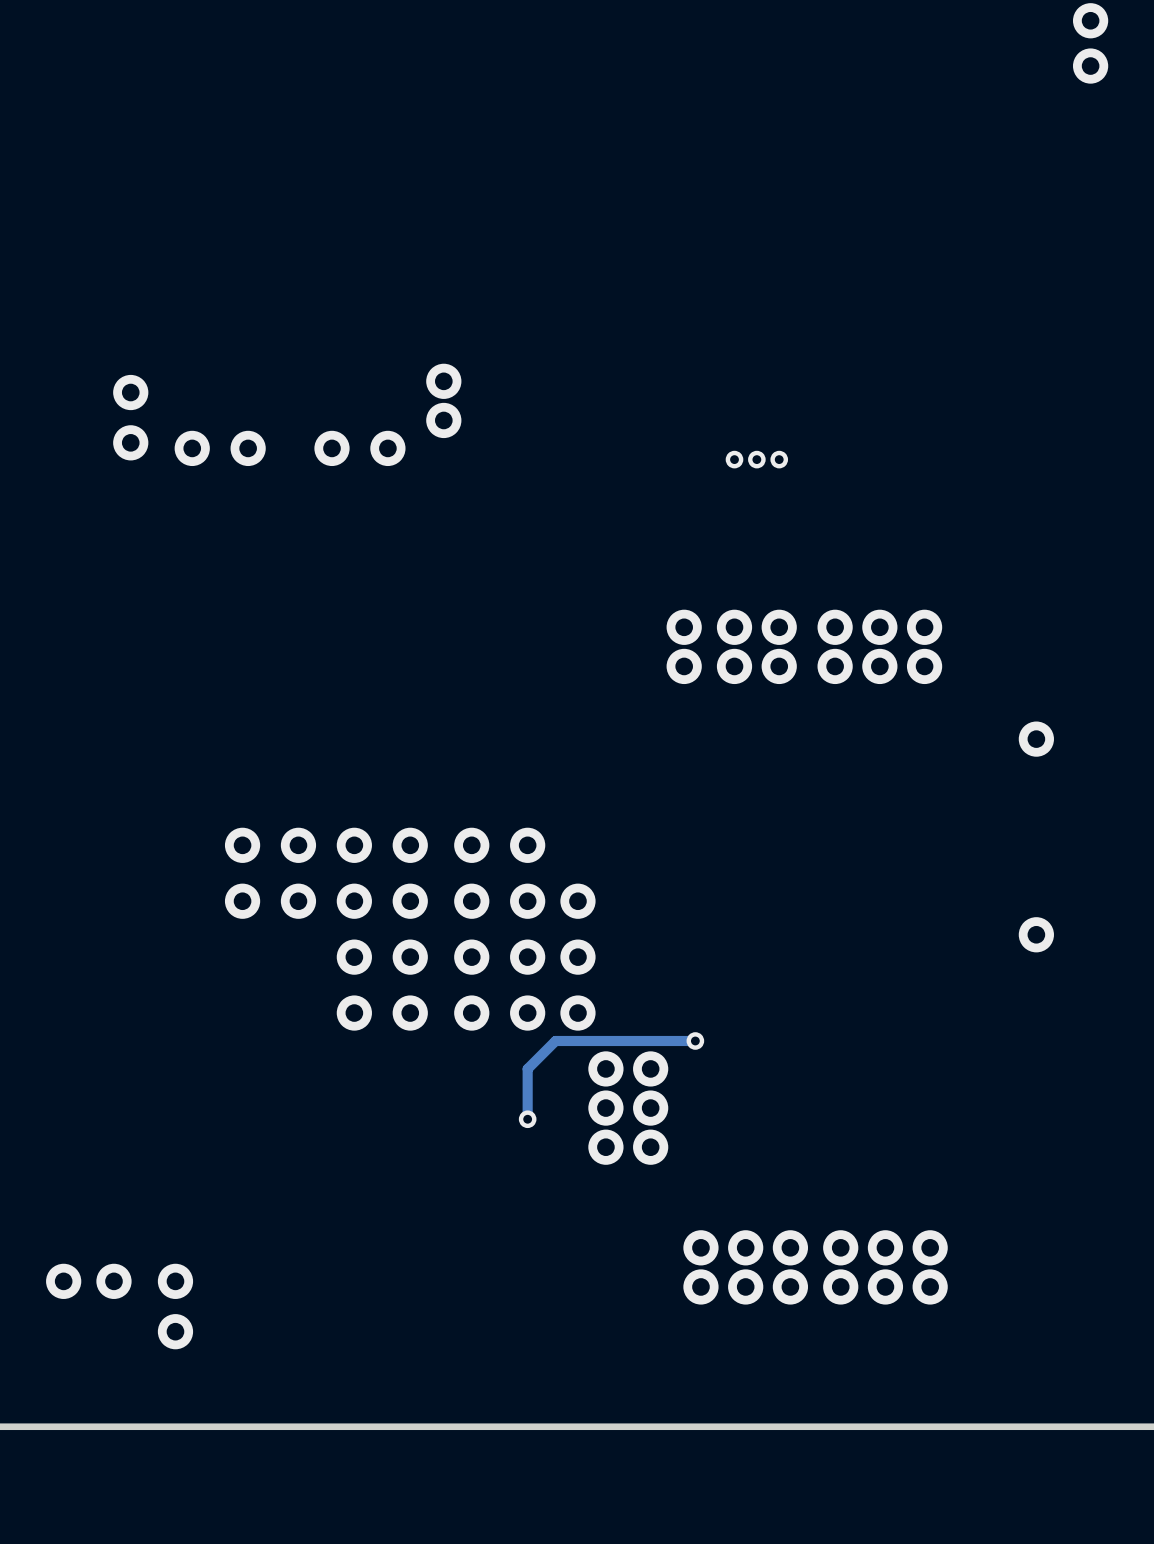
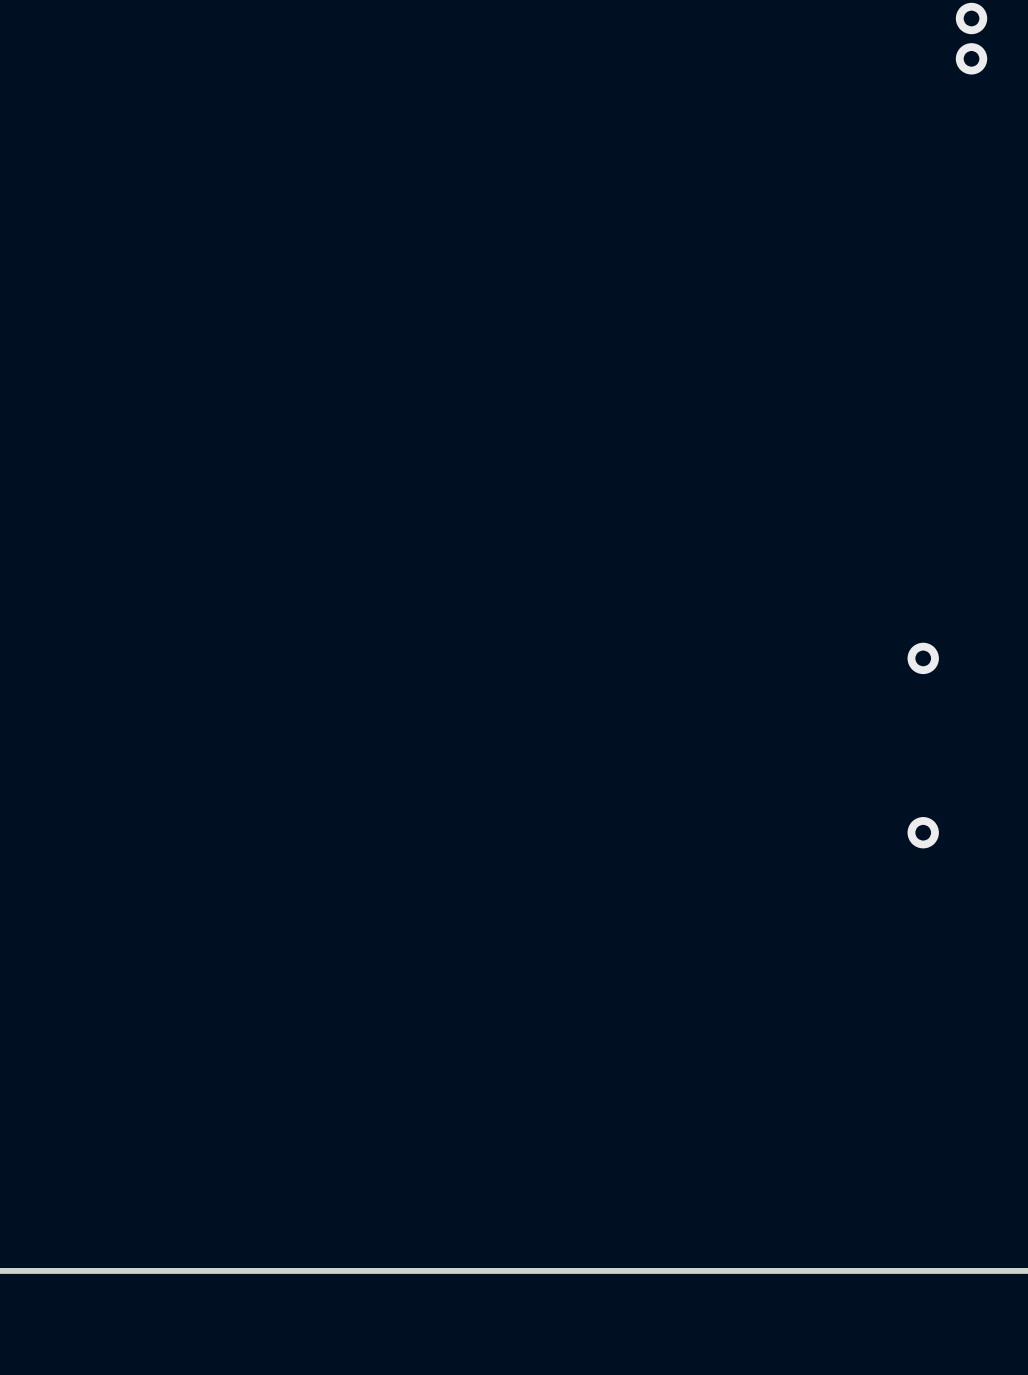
via: (443, 381) -> none
via: (130, 392) -> none
via: (443, 420) -> none
via: (130, 442) -> none
via: (192, 448) -> none
via: (248, 448) -> none
via: (332, 448) -> none
via: (387, 448) -> none
via: (734, 459) -> none
via: (756, 459) -> none
via: (779, 459) -> none
via: (684, 627) -> none
via: (734, 627) -> none
via: (779, 627) -> none
via: (835, 627) -> none
via: (879, 627) -> none
via: (924, 627) -> none
via: (684, 666) -> none
via: (734, 666) -> none
via: (779, 666) -> none
via: (835, 666) -> none
via: (879, 666) -> none
via: (924, 666) -> none
via: (242, 845) -> none
via: (298, 845) -> none
via: (354, 845) -> none
via: (410, 845) -> none
via: (471, 845) -> none
via: (527, 845) -> none
via: (242, 901) -> none
via: (298, 901) -> none
via: (354, 901) -> none
via: (410, 901) -> none
via: (471, 901) -> none
via: (527, 901) -> none
via: (577, 901) -> none
via: (354, 957) -> none
via: (410, 957) -> none
via: (471, 957) -> none
via: (527, 957) -> none
via: (577, 957) -> none
via: (354, 1013) -> none
via: (410, 1013) -> none
via: (471, 1013) -> none
via: (527, 1013) -> none
via: (577, 1013) -> none
track: (695, 1040) (555, 1040) (527, 1068) (527, 1119) -> none
via: (695, 1040) -> none
via: (605, 1068) -> none
via: (650, 1068) -> none
via: (605, 1108) -> none
via: (650, 1108) -> none
via: (527, 1119) -> none
via: (605, 1147) -> none
via: (650, 1147) -> none
via: (700, 1247) -> none
via: (745, 1247) -> none
via: (790, 1247) -> none
via: (840, 1247) -> none
via: (885, 1247) -> none
via: (930, 1247) -> none
via: (63, 1281) -> none
via: (113, 1281) -> none
via: (175, 1281) -> none
via: (700, 1286) -> none
via: (745, 1286) -> none
via: (790, 1286) -> none
via: (840, 1286) -> none
via: (885, 1286) -> none
via: (930, 1286) -> none
via: (175, 1331) -> none

